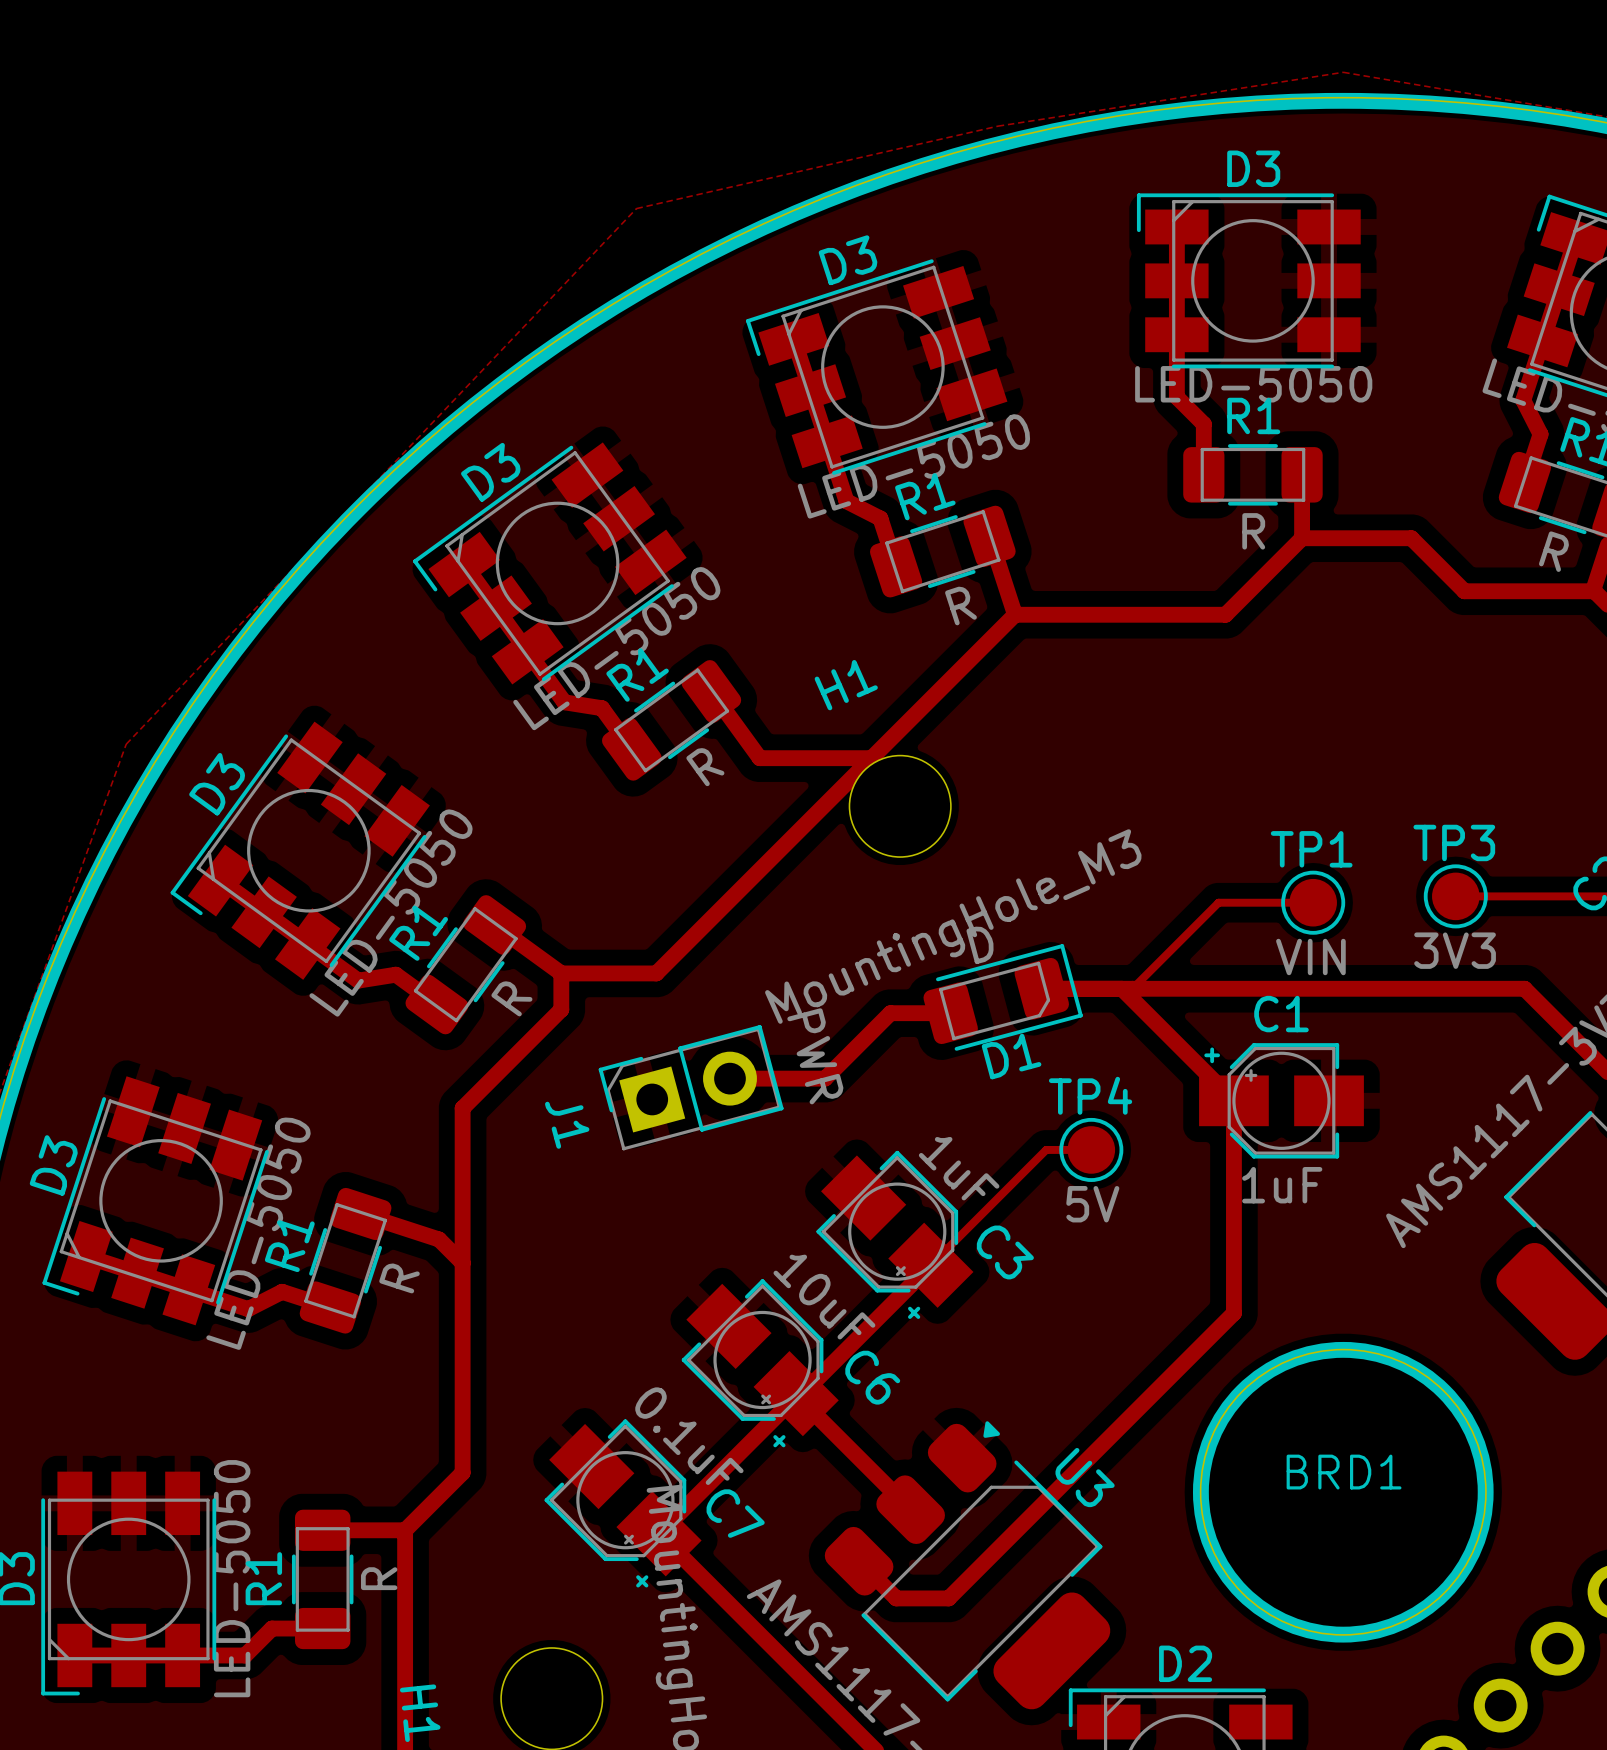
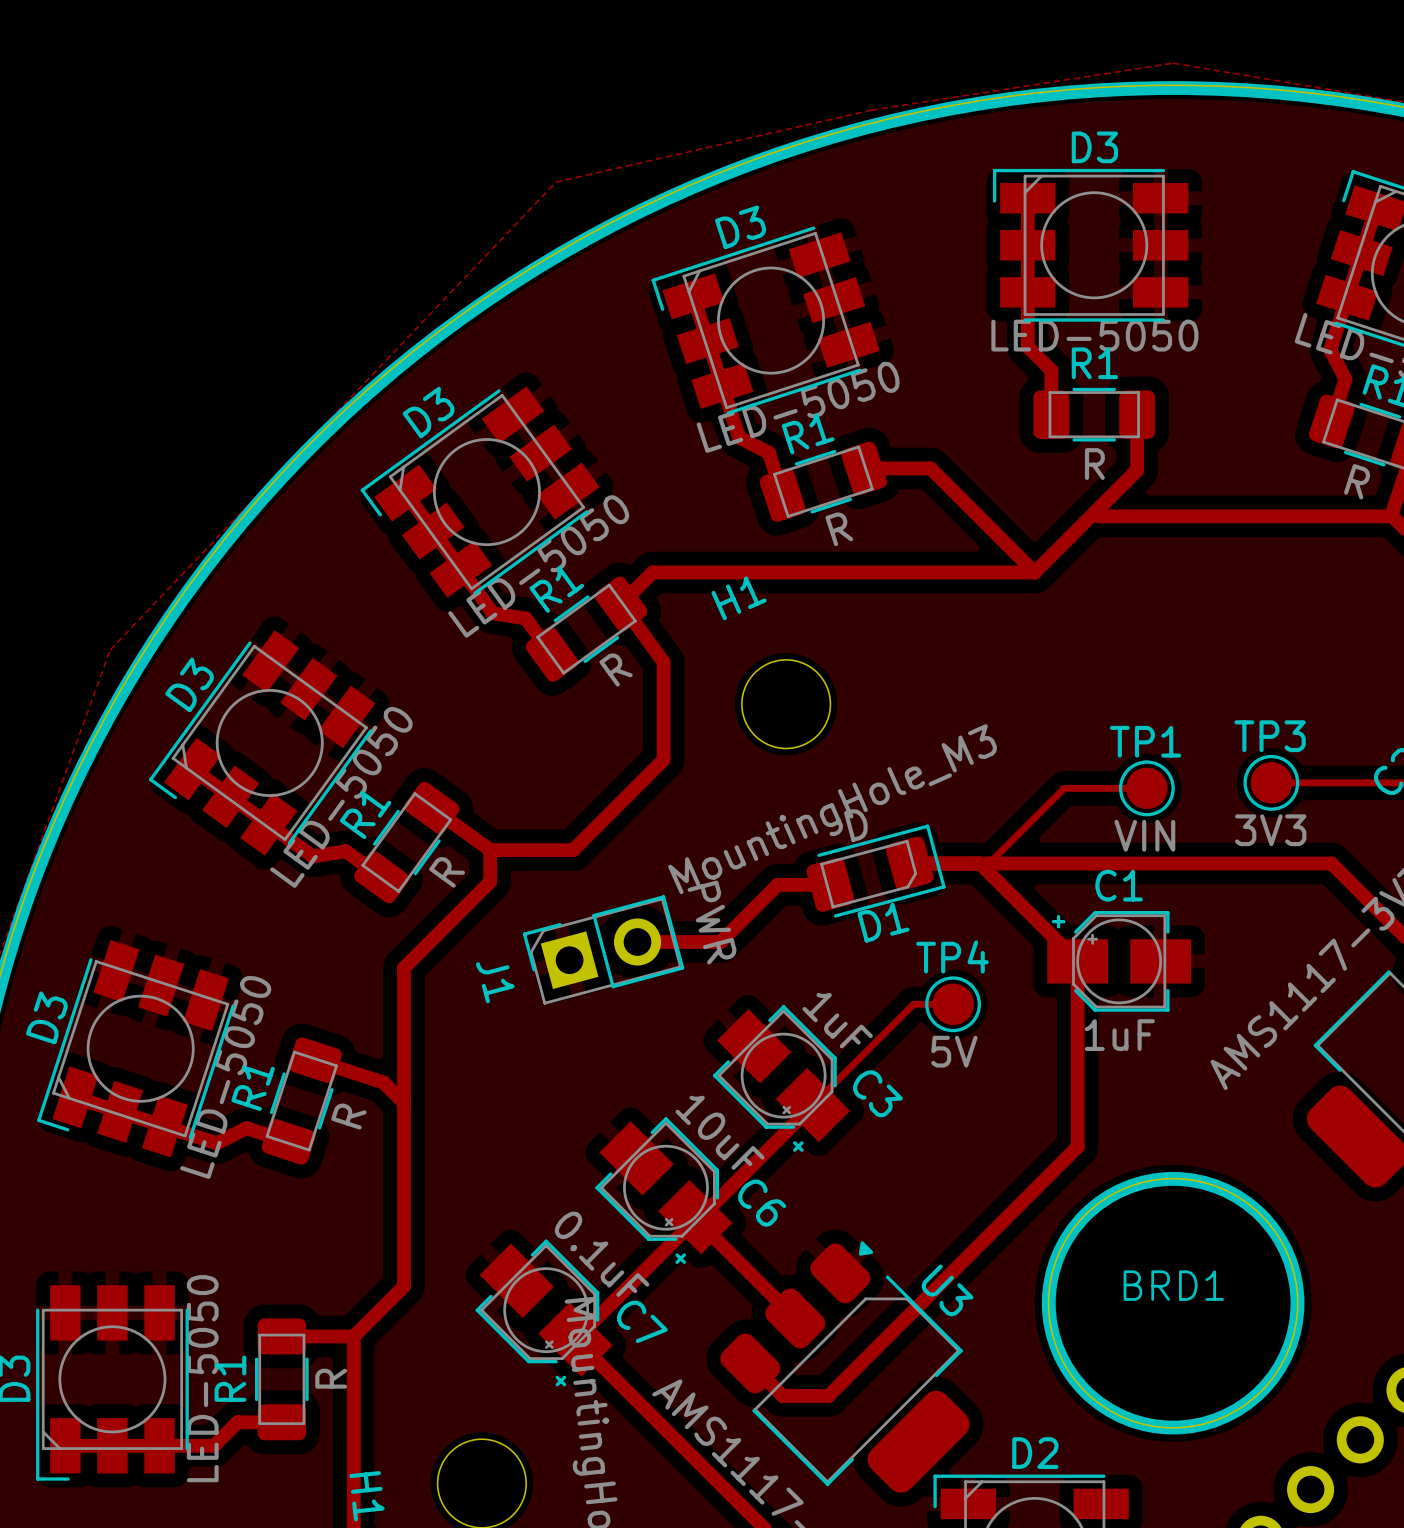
track: (989, 536) (1015, 614) -> (864, 468) (930, 468) (1034, 572)
track: (1302, 538) (1411, 538) (1464, 591) -> (1094, 512) (1099, 516) (1278, 516)
track: (1015, 614) (1225, 614) -> (1034, 572) (1070, 536)
track: (1015, 614) (759, 870) -> none
track: none -> (1034, 572) (652, 572) (621, 603)
track: (759, 758) (871, 758) -> (663, 662) (663, 759)

